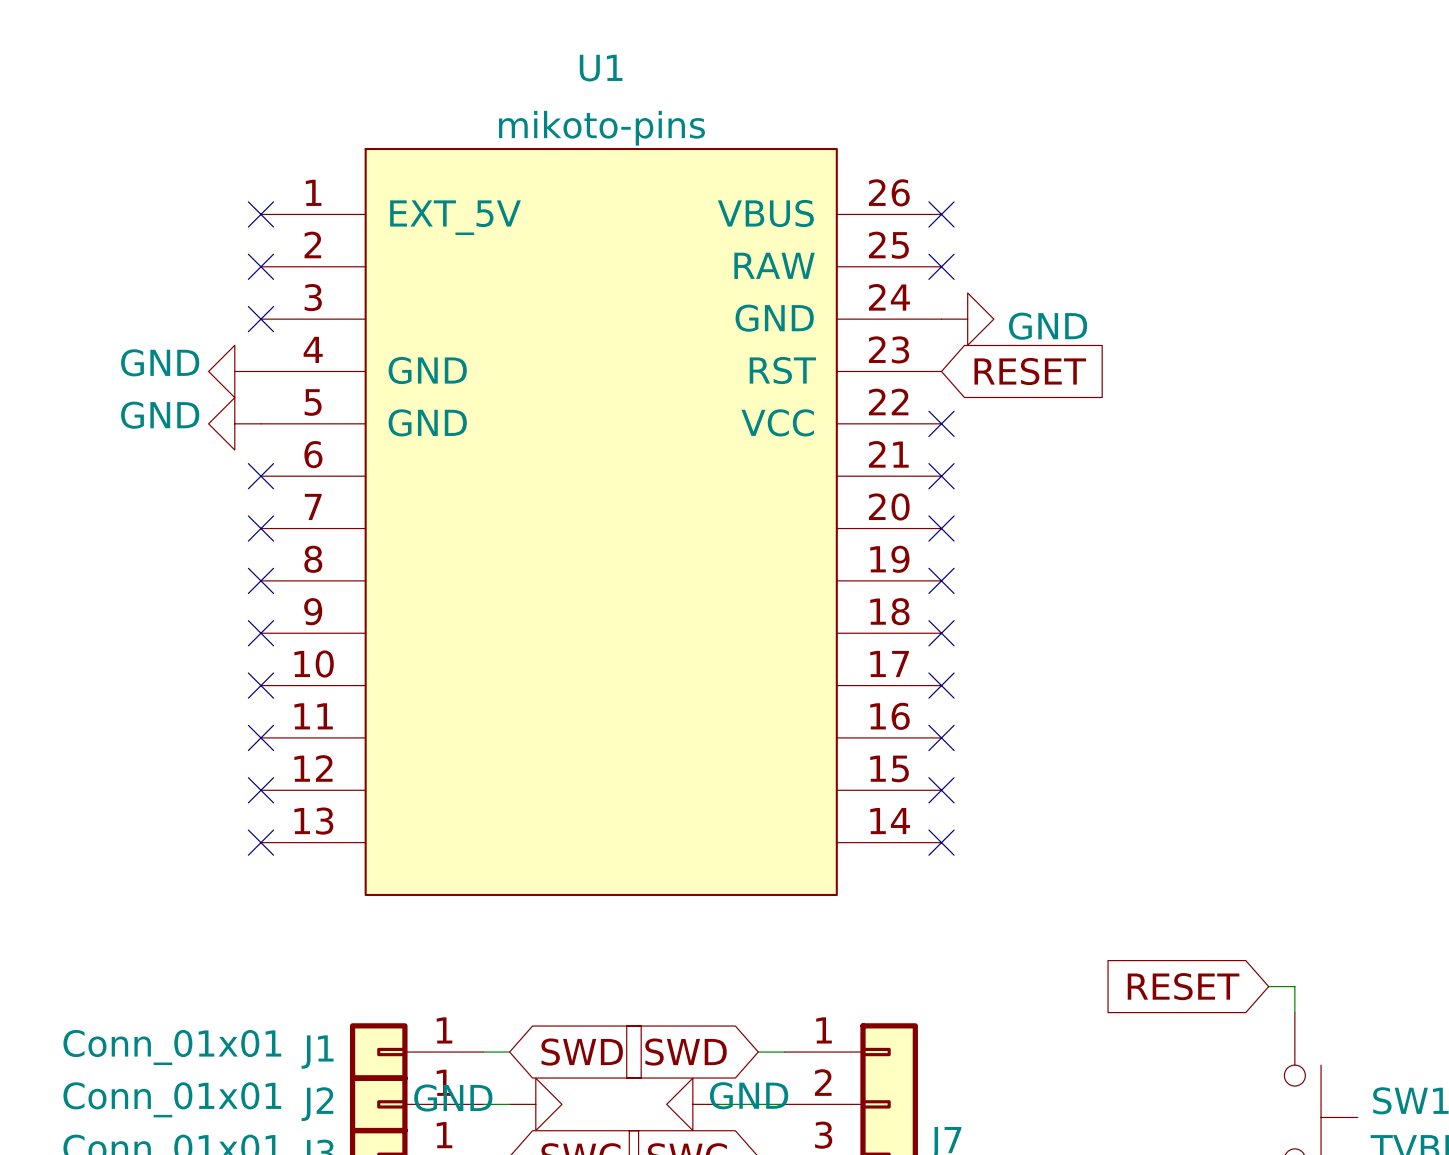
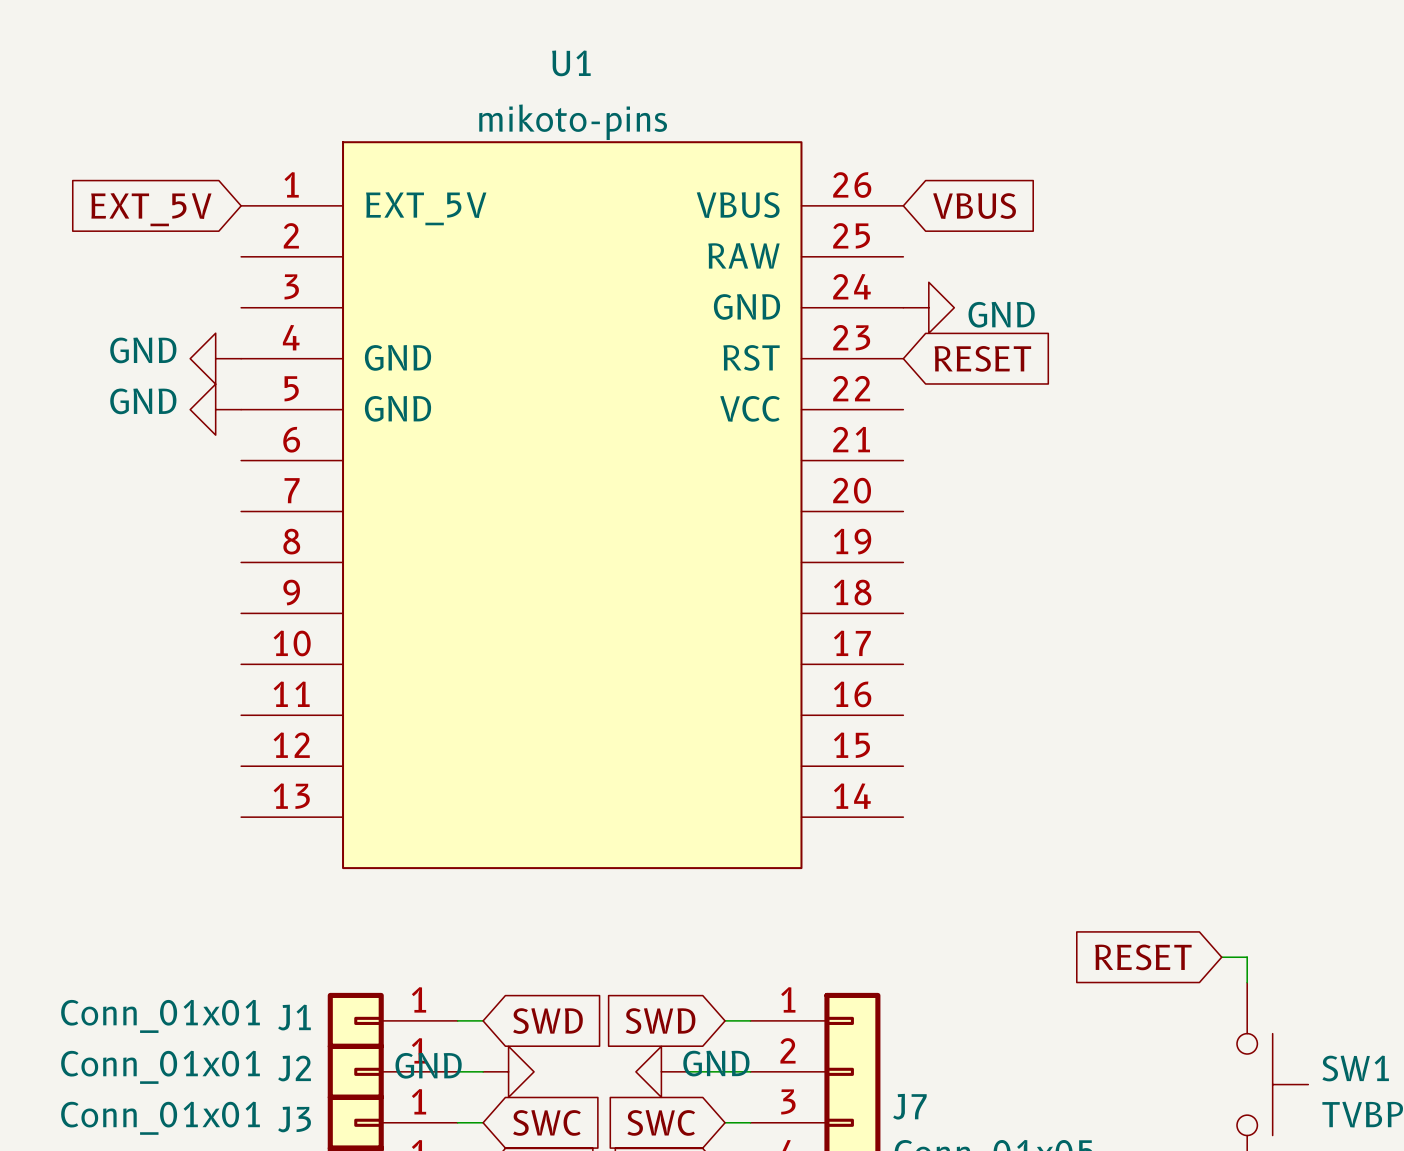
no-connect mark: (260, 214) -> none
no-connect mark: (941, 214) -> none
global label: none -> VBUS (974, 206)
global label: none -> EXT_5V (151, 209)
no-connect mark: (260, 266) -> none
no-connect mark: (941, 266) -> none
no-connect mark: (260, 319) -> none
no-connect mark: (941, 423) -> none
no-connect mark: (260, 476) -> none
no-connect mark: (941, 476) -> none
no-connect mark: (260, 528) -> none
no-connect mark: (941, 528) -> none
no-connect mark: (260, 580) -> none
no-connect mark: (941, 580) -> none
no-connect mark: (260, 633) -> none
no-connect mark: (941, 633) -> none
no-connect mark: (260, 685) -> none
no-connect mark: (941, 685) -> none
no-connect mark: (260, 737) -> none
no-connect mark: (941, 737) -> none
no-connect mark: (260, 790) -> none
no-connect mark: (941, 790) -> none
no-connect mark: (260, 842) -> none
no-connect mark: (941, 842) -> none

